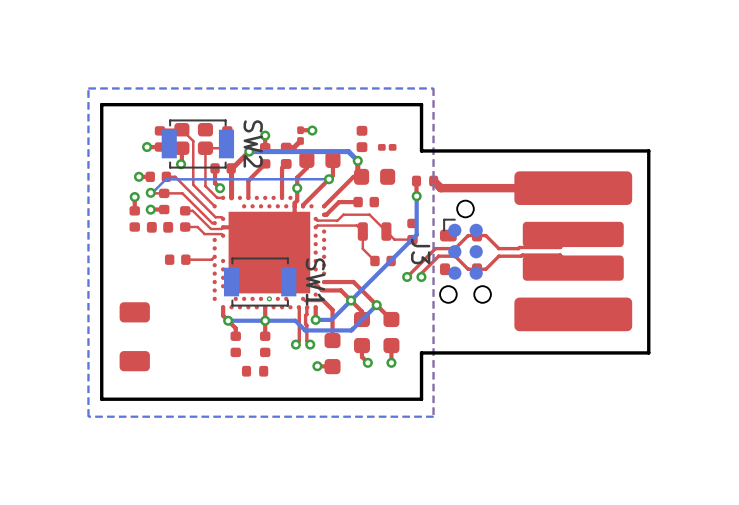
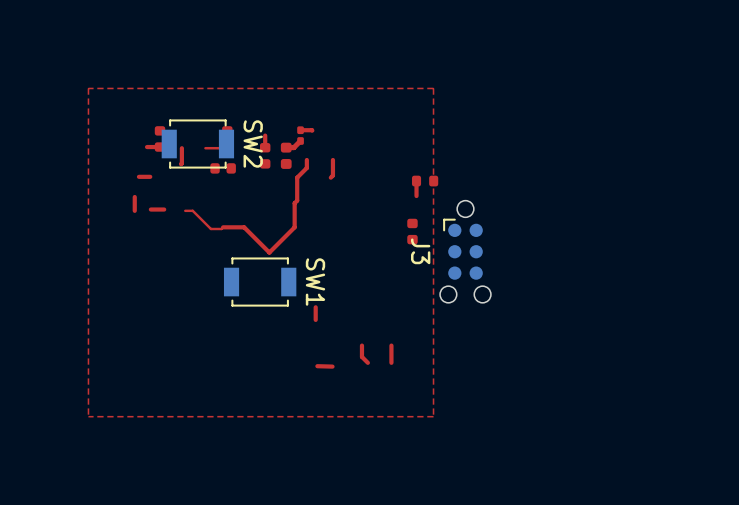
bottom zone outline: (433, 88) (88, 88) (88, 416) (433, 416) (433, 88) -> none
board edge: (421, 104) (421, 150) (648, 150) (648, 352) (421, 352) (421, 399) (101, 399) (101, 104) (421, 104) -> none
top track: (160, 130) (181, 129) (193, 141) (193, 184) (214, 206) -> none
via: (312, 130) -> none
via: (265, 135) -> none
part: (193, 138) -> none
part: (361, 138) -> none
via: (147, 147) -> none
part: (387, 147) -> none
top track: (204, 149) (205, 148) (205, 186) (217, 197) (223, 197) -> none
top track: (249, 151) (231, 168) (231, 197) -> none
bottom track: (249, 151) (348, 151) (357, 160) -> none
via: (249, 151) -> none
part: (319, 160) -> none
top track: (357, 160) (357, 173) (361, 176) (353, 176) (324, 206) -> none
via: (357, 160) -> none
top track: (265, 163) (248, 180) (248, 197) -> none
top track: (286, 163) (282, 168) (282, 197) -> none
via: (181, 164) -> none
top track: (215, 168) (215, 183) (220, 188) -> none
via: (138, 176) -> none
part: (158, 176) -> none
top track: (168, 176) (175, 176) (215, 217) (223, 218) -> none
part: (374, 176) -> none
top track: (330, 177) (303, 206) -> none
bottom track: (329, 179) (165, 179) (150, 192) -> none
via: (329, 179) -> none
top track: (433, 181) (440, 188) (573, 188) -> none
via: (220, 188) -> none
via: (297, 188) -> none
top track: (150, 192) (182, 193) (212, 223) (214, 223) -> none
via: (150, 192) -> none
bottom track: (416, 196) (416, 234) (331, 319) (315, 319) -> none
via: (416, 196) -> none
via: (134, 197) -> none
part: (164, 201) -> none
top track: (358, 202) (339, 202) (324, 214) -> none
part: (366, 202) -> none
via: (150, 209) -> none
part: (134, 218) -> none
part: (185, 218) -> none
top track: (315, 218) (317, 220) (337, 220) (343, 214) (369, 214) (394, 239) (412, 239) -> none
part: (160, 227) -> none
top track: (184, 227) (197, 226) (204, 234) (221, 234) (223, 235) -> none
top track: (315, 227) (317, 225) (356, 225) (362, 231) -> none
top track: (362, 231) (362, 248) (374, 260) (374, 257) -> none
part: (374, 231) -> none
top track: (573, 234) (560, 247) (518, 248) (498, 248) (485, 235) (468, 235) (455, 248) (435, 248) (407, 276) -> none
part: (573, 251) -> none
part: (269, 252) -> none
part: (461, 252) -> none
top track: (214, 256) (211, 259) (185, 259) -> none
part: (177, 259) -> none
part: (383, 260) -> none
top track: (573, 268) (560, 255) (498, 256) (485, 269) (468, 269) (455, 256) (438, 256) (421, 273) (421, 276) -> none
via: (407, 276) -> none
via: (421, 276) -> none
top track: (324, 282) (353, 282) (391, 319) -> none
top track: (315, 286) (321, 290) (340, 290) (361, 311) (361, 319) -> none
via: (269, 298) -> none
top track: (303, 298) (305, 300) (323, 300) (332, 309) (332, 340) -> none
via: (351, 300) -> none
bottom track: (376, 305) (351, 330) (305, 330) (295, 320) (228, 320) -> none
via: (376, 305) -> none
top track: (223, 307) (223, 315) (235, 328) (235, 336) -> none
top track: (265, 307) (265, 336) -> none
top track: (298, 307) (299, 341) (295, 344) -> none
top track: (307, 307) (305, 315) (306, 341) (310, 344) -> none
via: (315, 319) -> none
via: (228, 320) -> none
via: (265, 320) -> none
part: (361, 332) -> none
part: (391, 332) -> none
part: (134, 336) -> none
part: (235, 344) -> none
part: (265, 344) -> none
via: (295, 344) -> none
via: (310, 344) -> none
part: (332, 353) -> none
via: (367, 362) -> none
via: (391, 362) -> none
via: (317, 366) -> none
part: (255, 371) -> none

